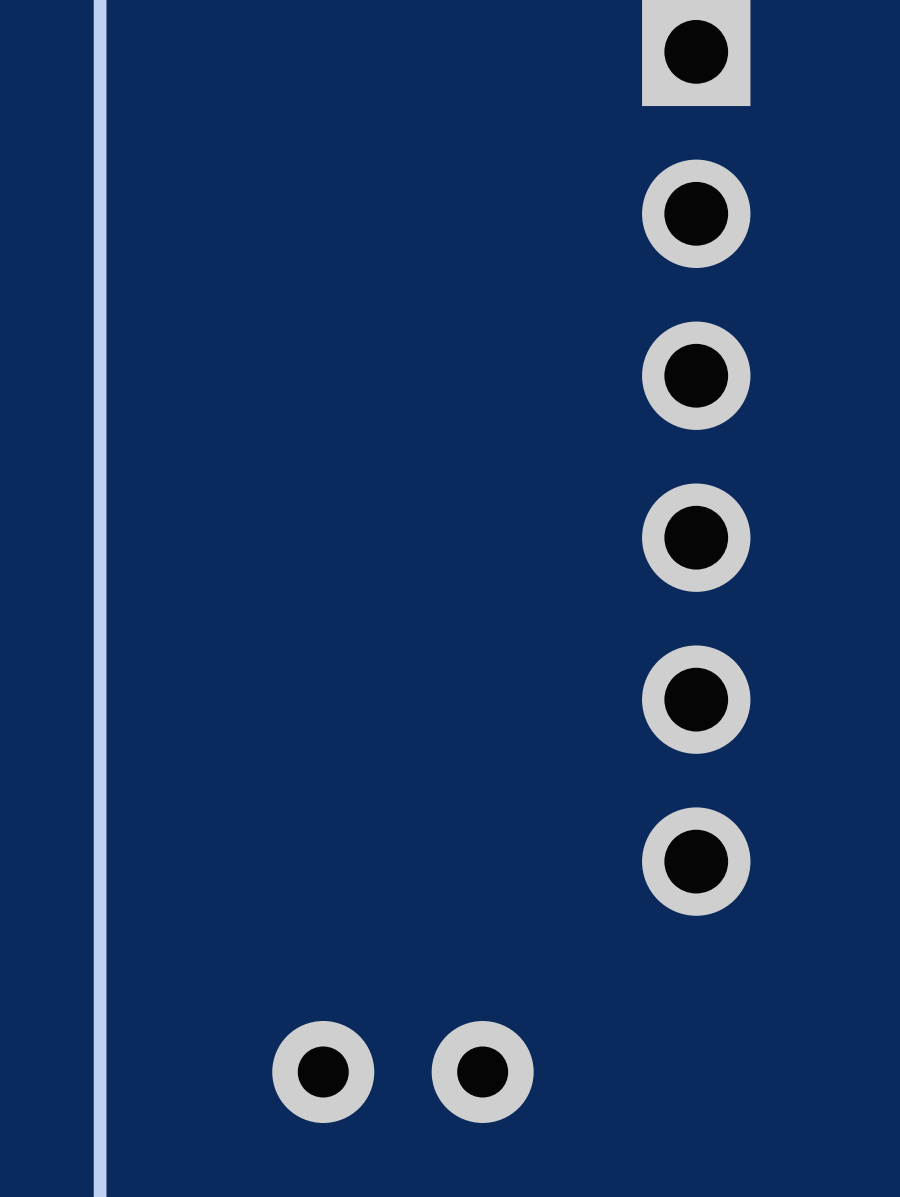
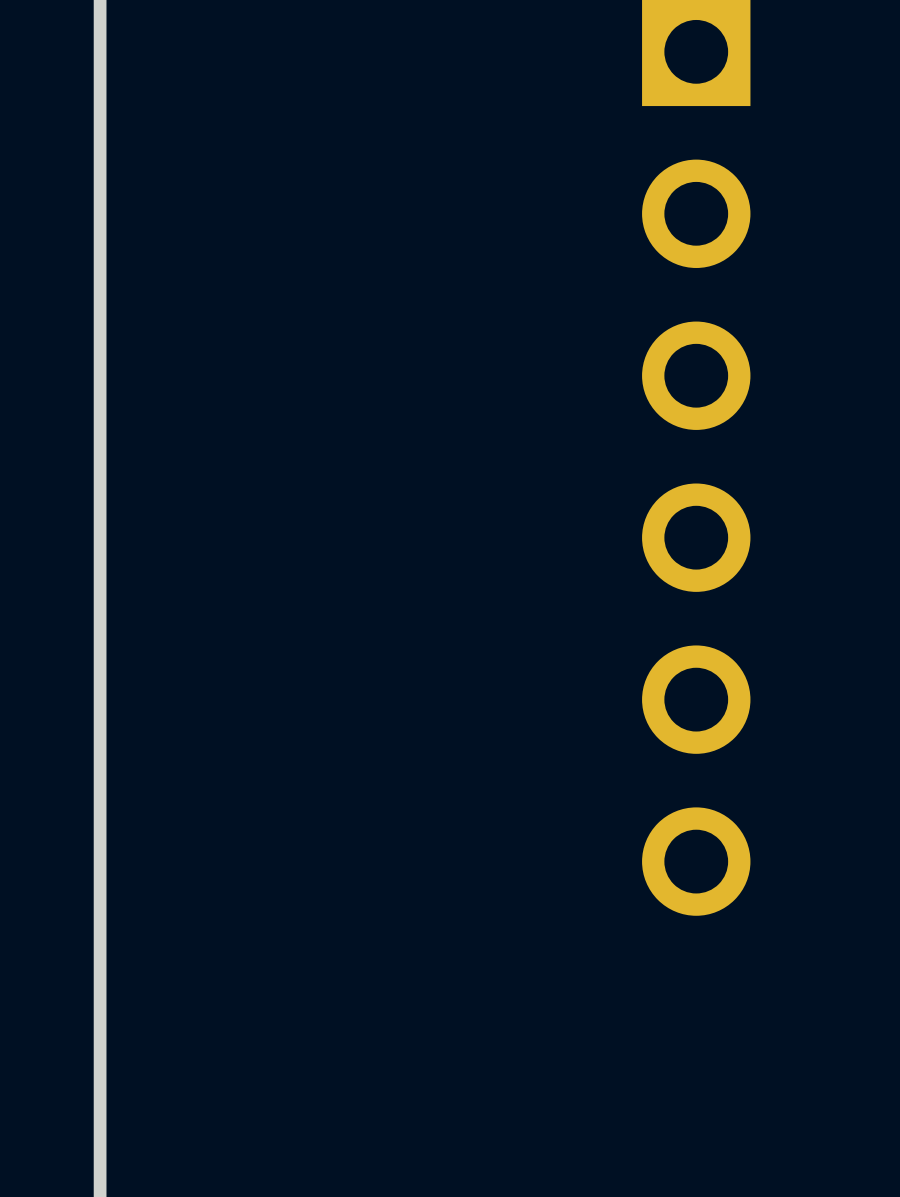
part: (402, 1071) -> none

